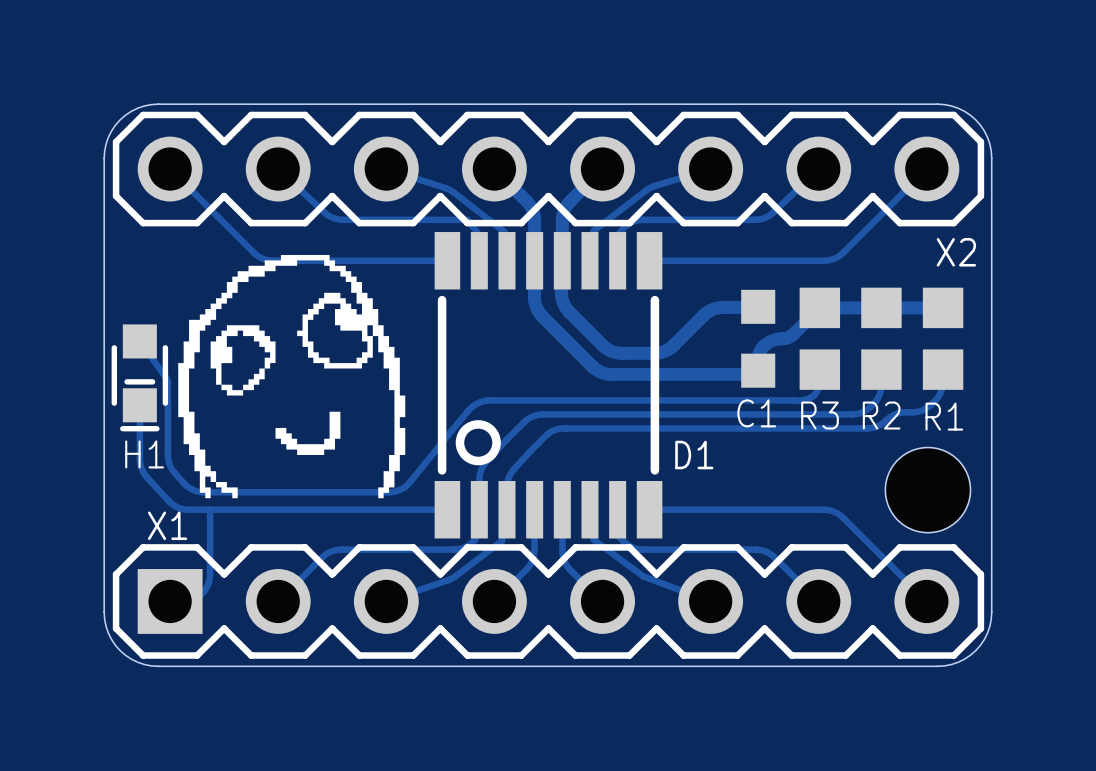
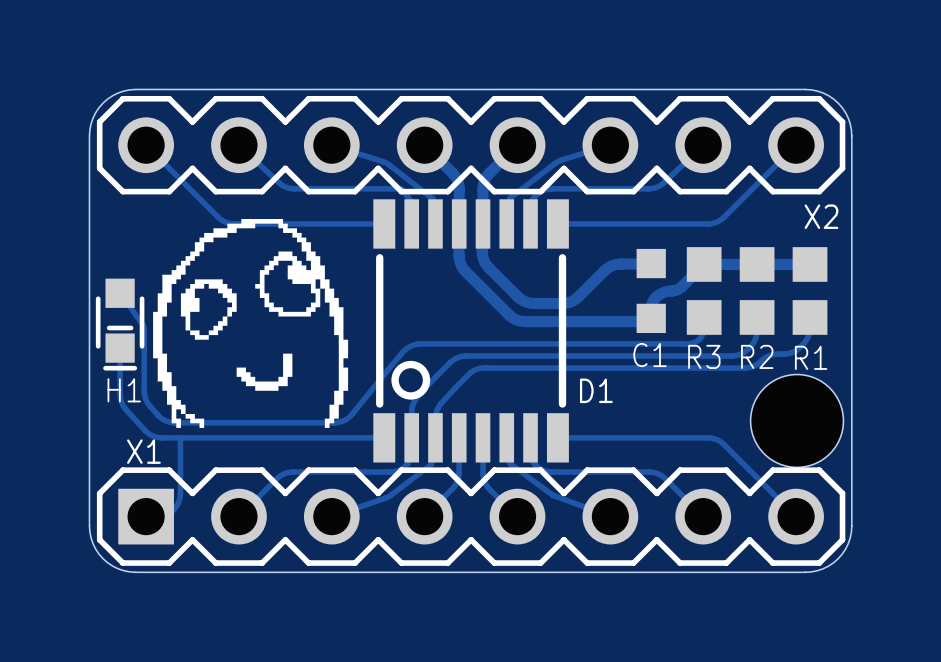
hole size: [885, 447, 971, 533] -> [750, 374, 844, 468]

